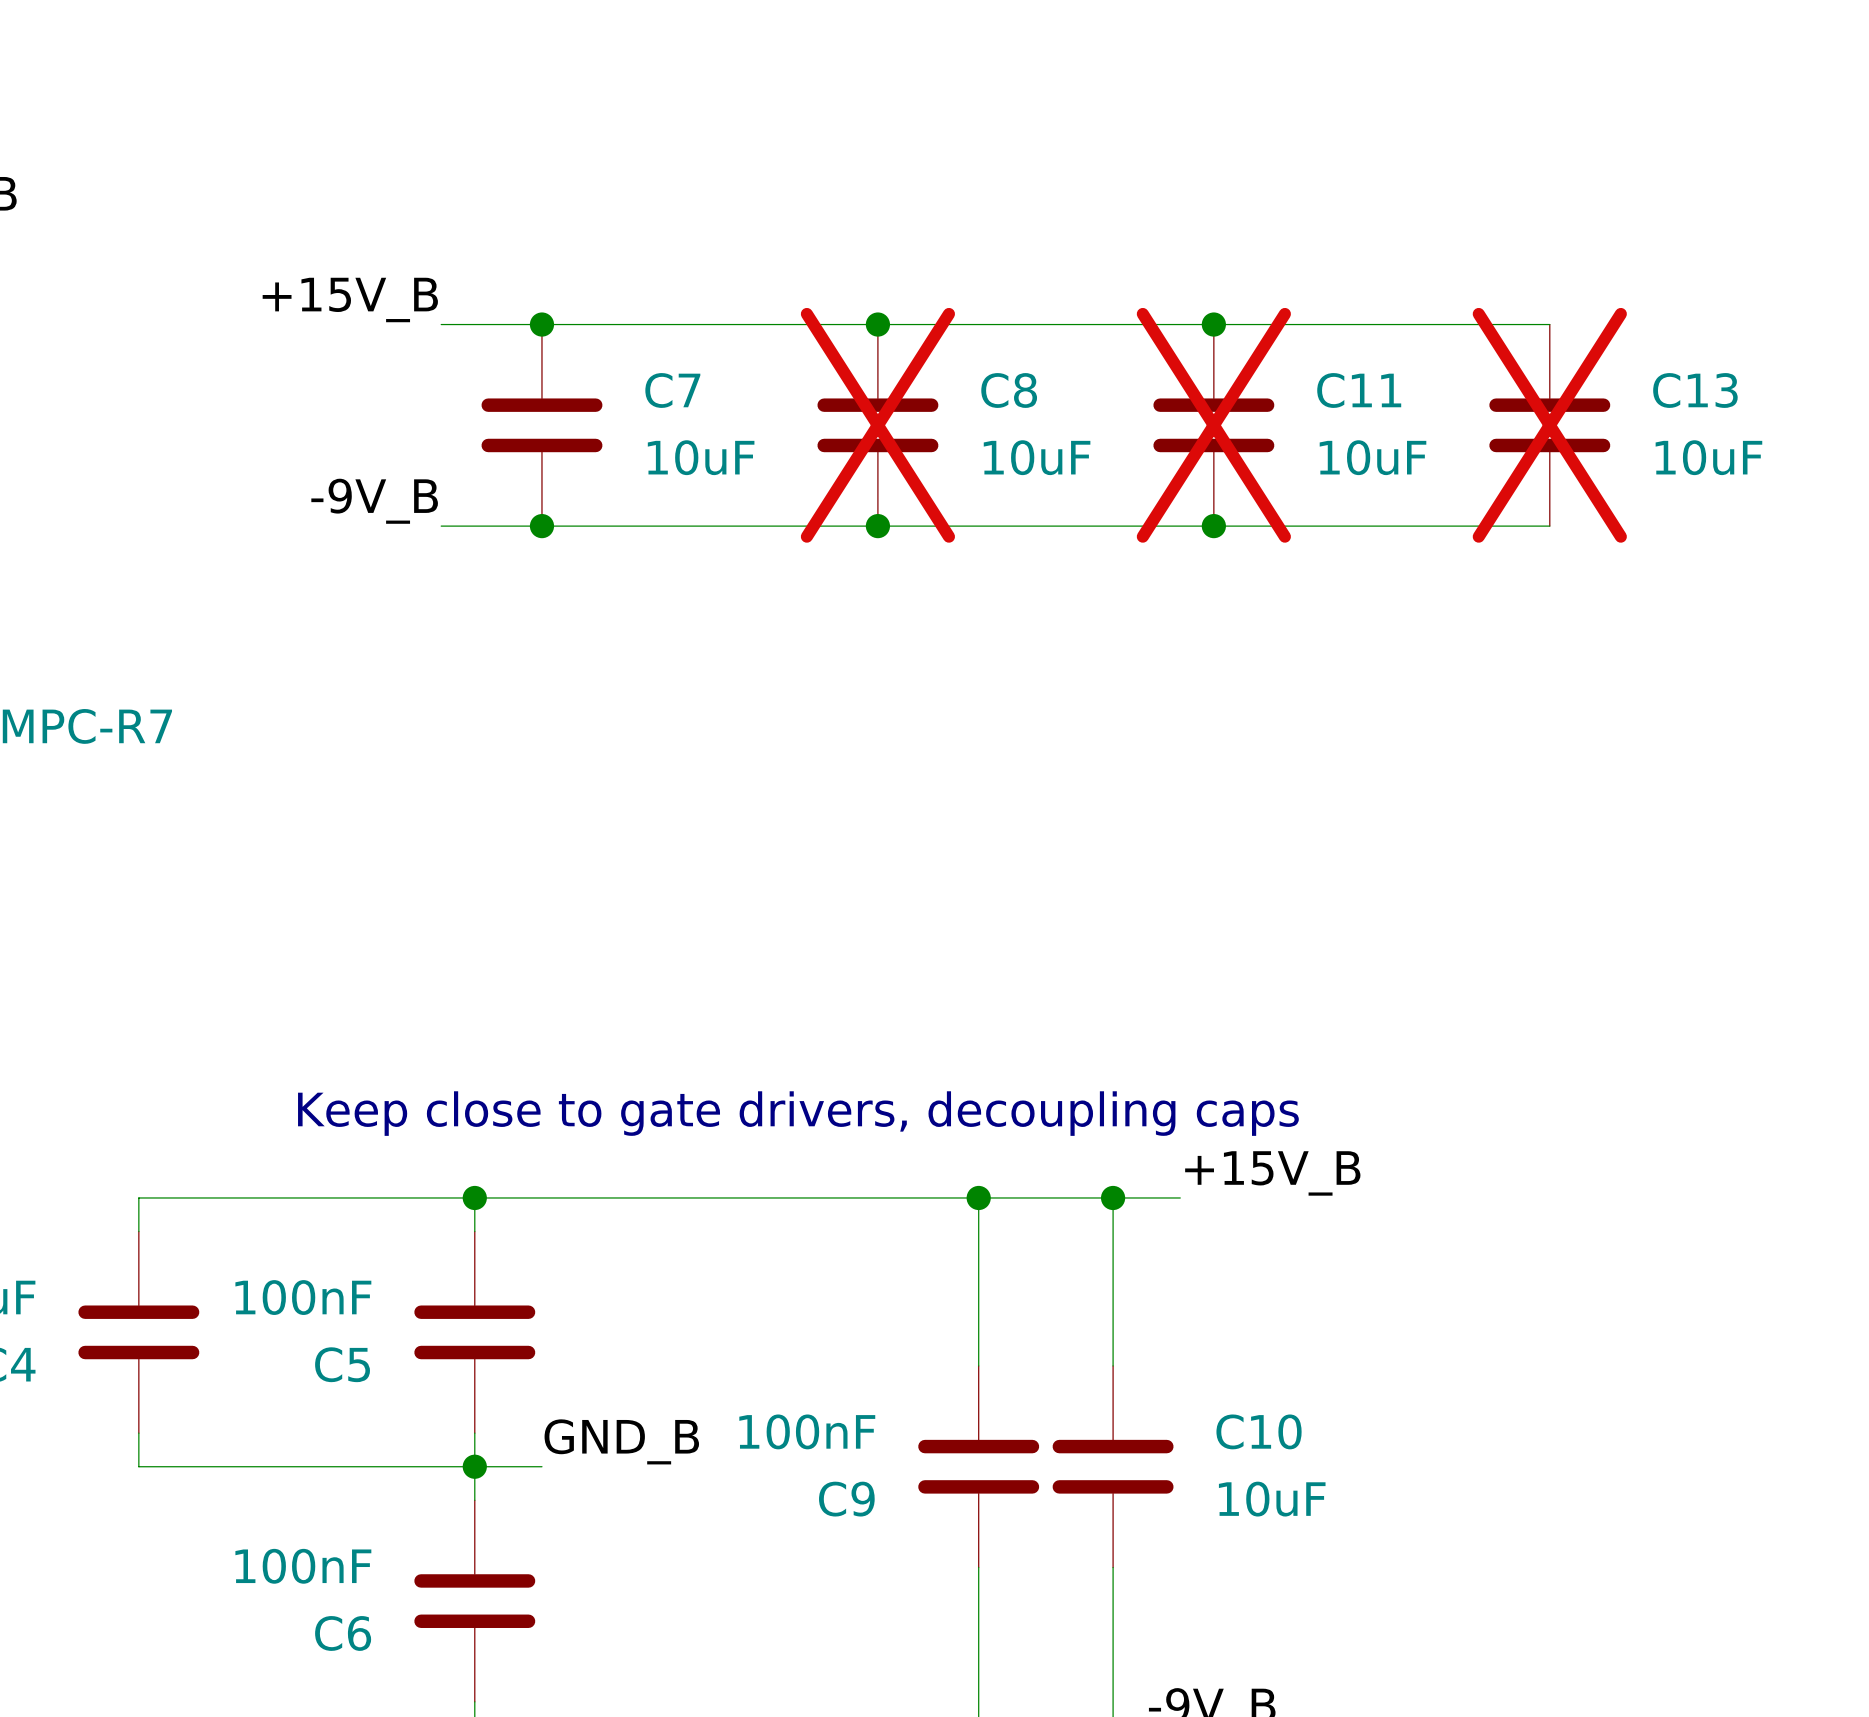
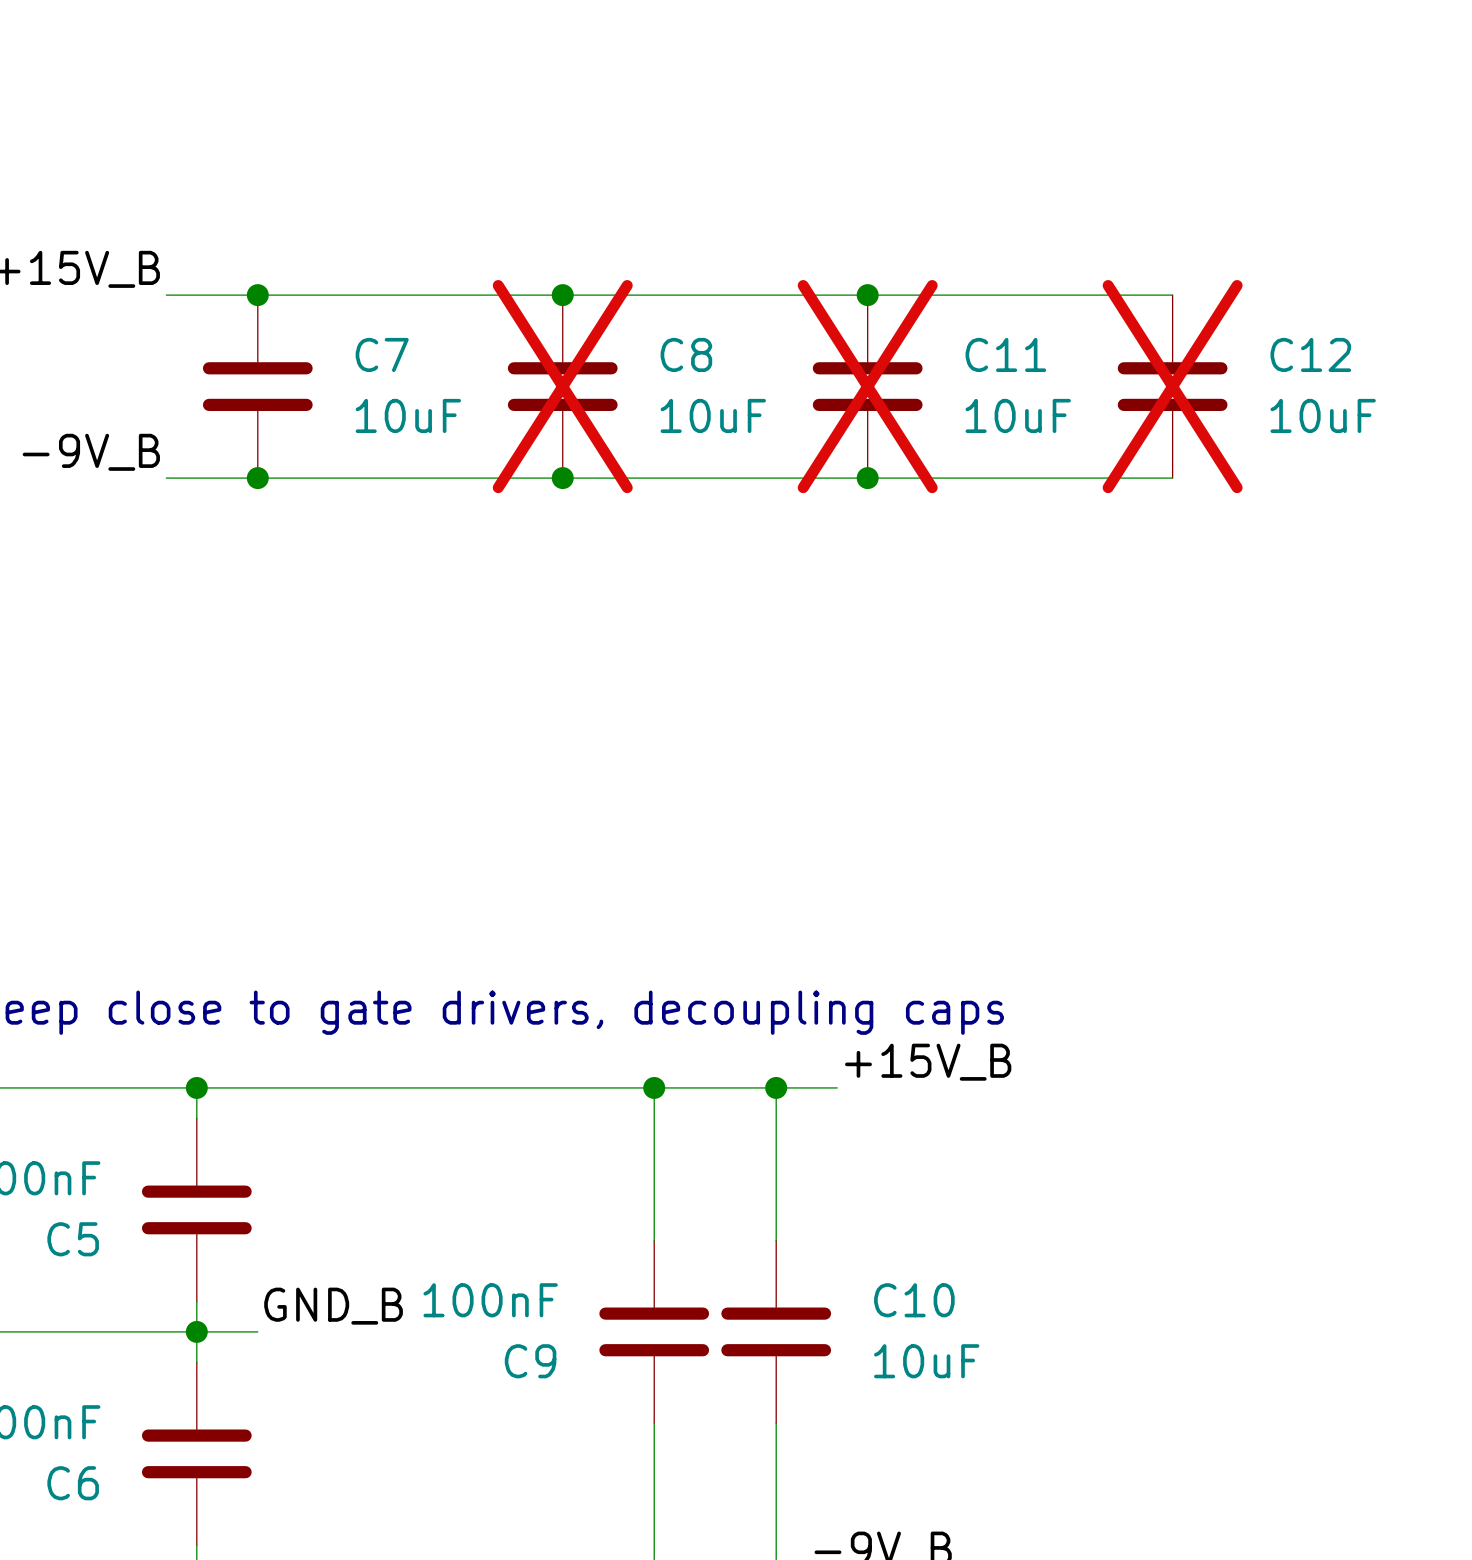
C13 name: C13 (1695, 390) -> C12 (1310, 354)

